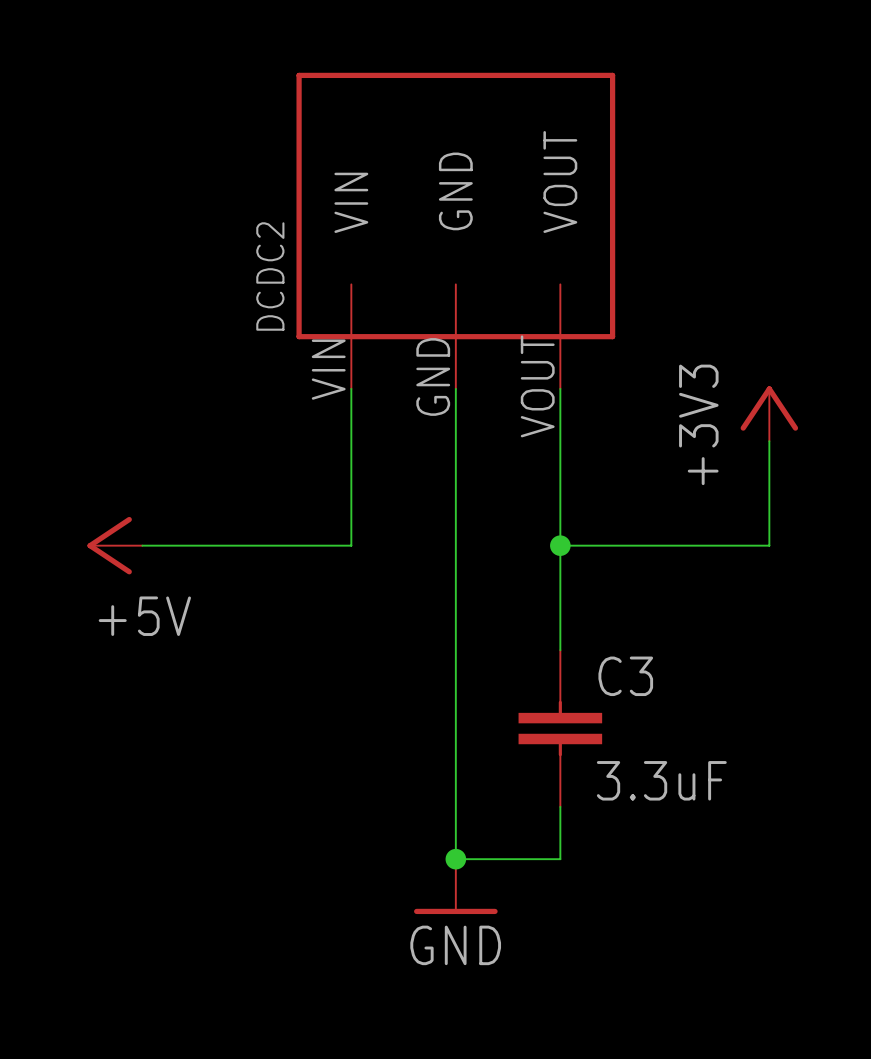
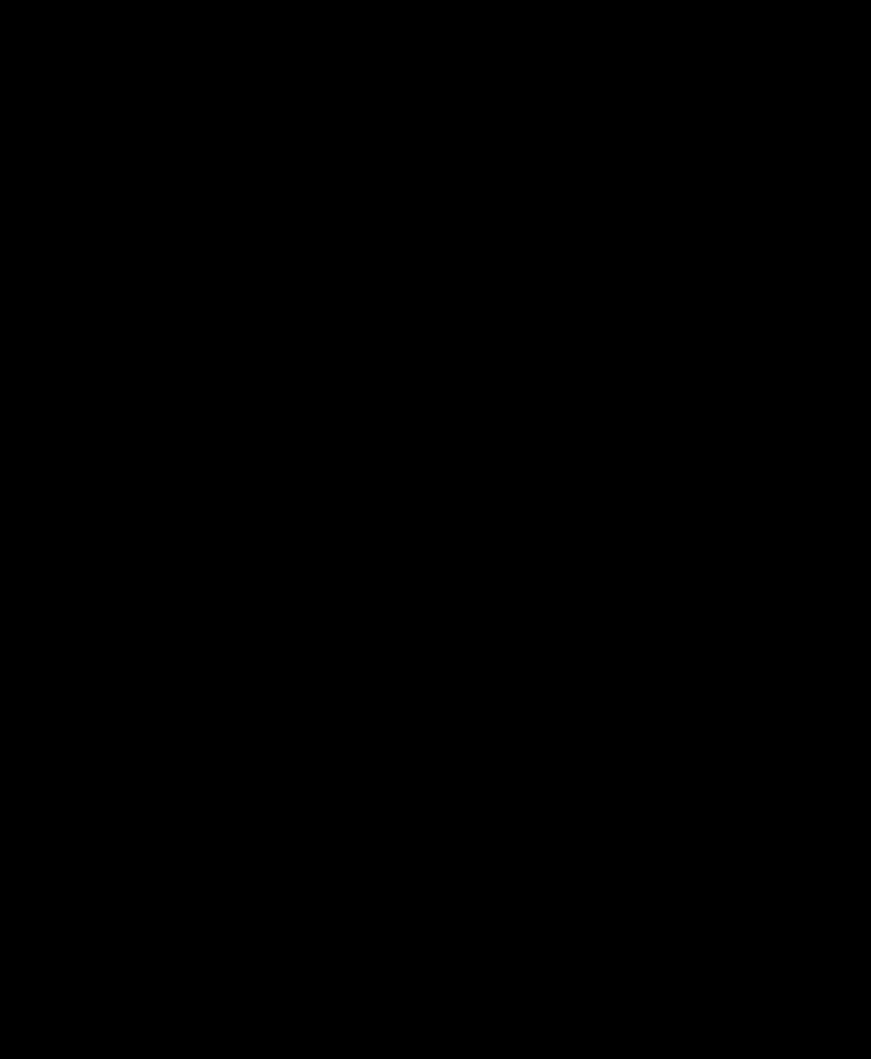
DCDC2: (455, 230) -> none
wire: (351, 388) (351, 545) (142, 545) -> none
wire: (455, 388) (455, 859) (560, 859) (560, 806) -> none
wire: (560, 388) (560, 650) -> none
power symbol: +3V3 (769, 413) -> none
wire: (769, 441) (769, 545) (560, 545) -> none
power symbol: +5V (114, 545) -> none
junction: (560, 545) -> none
C3: 3.3uF (560, 728) -> none
junction: (455, 859) -> none
power symbol: GND (455, 886) -> none

